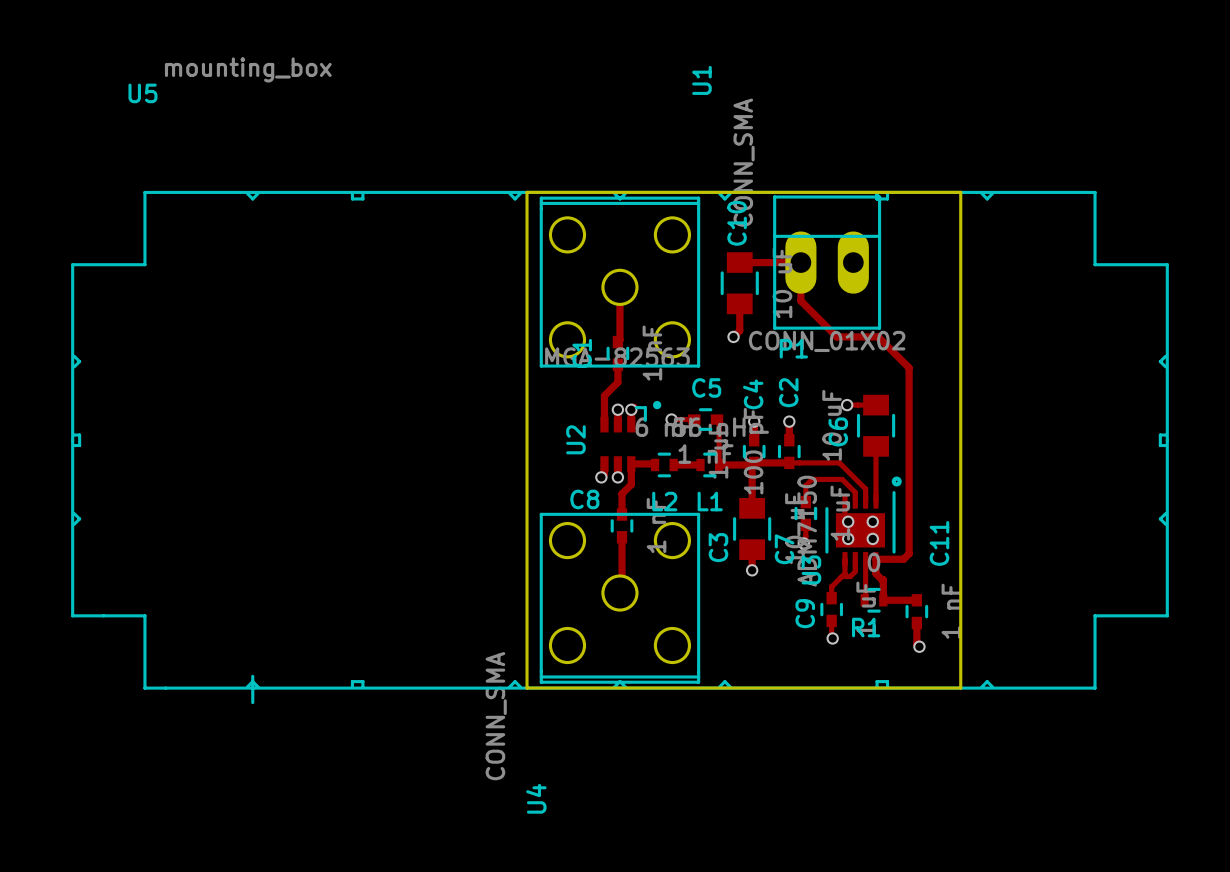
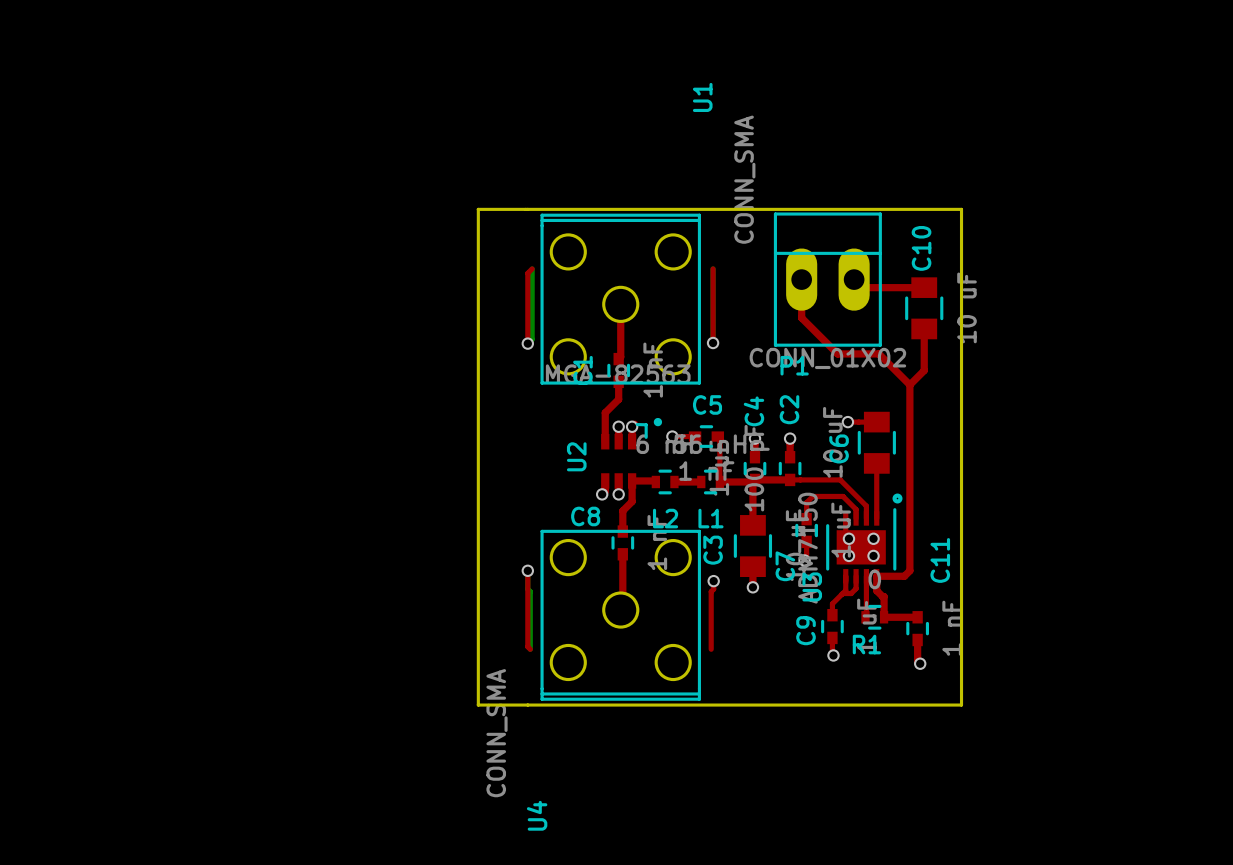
board edge: (527, 192) (527, 688) -> (527, 209) (478, 209) (478, 705) (527, 705)
top track: none -> (532, 268) (527, 273) (527, 343)
bottom track: none -> (532, 268) (532, 339) (527, 343)
top track: none -> (713, 268) (713, 343)
top track: (739, 262) (800, 262) -> none
top track: none -> (854, 279) (862, 287) (924, 287)
C10 position: (739, 283) -> (924, 308)
top track: (739, 303) (739, 330) (733, 336) -> none
top track: none -> (924, 328) (924, 370) (909, 384)
via: none -> (527, 343)
via position: (733, 336) -> (713, 343)
U5: mounting_box (619, 447) -> none
C3 name position: C3 (718, 547) -> C3 (713, 550)
top track: none -> (527, 570) (527, 646) (530, 649)
bottom track: none -> (527, 570) (527, 589) (530, 591) (530, 649)
via: none -> (527, 570)
top track: none -> (713, 581) (713, 589) (711, 591) (711, 649)
via: none -> (713, 581)

